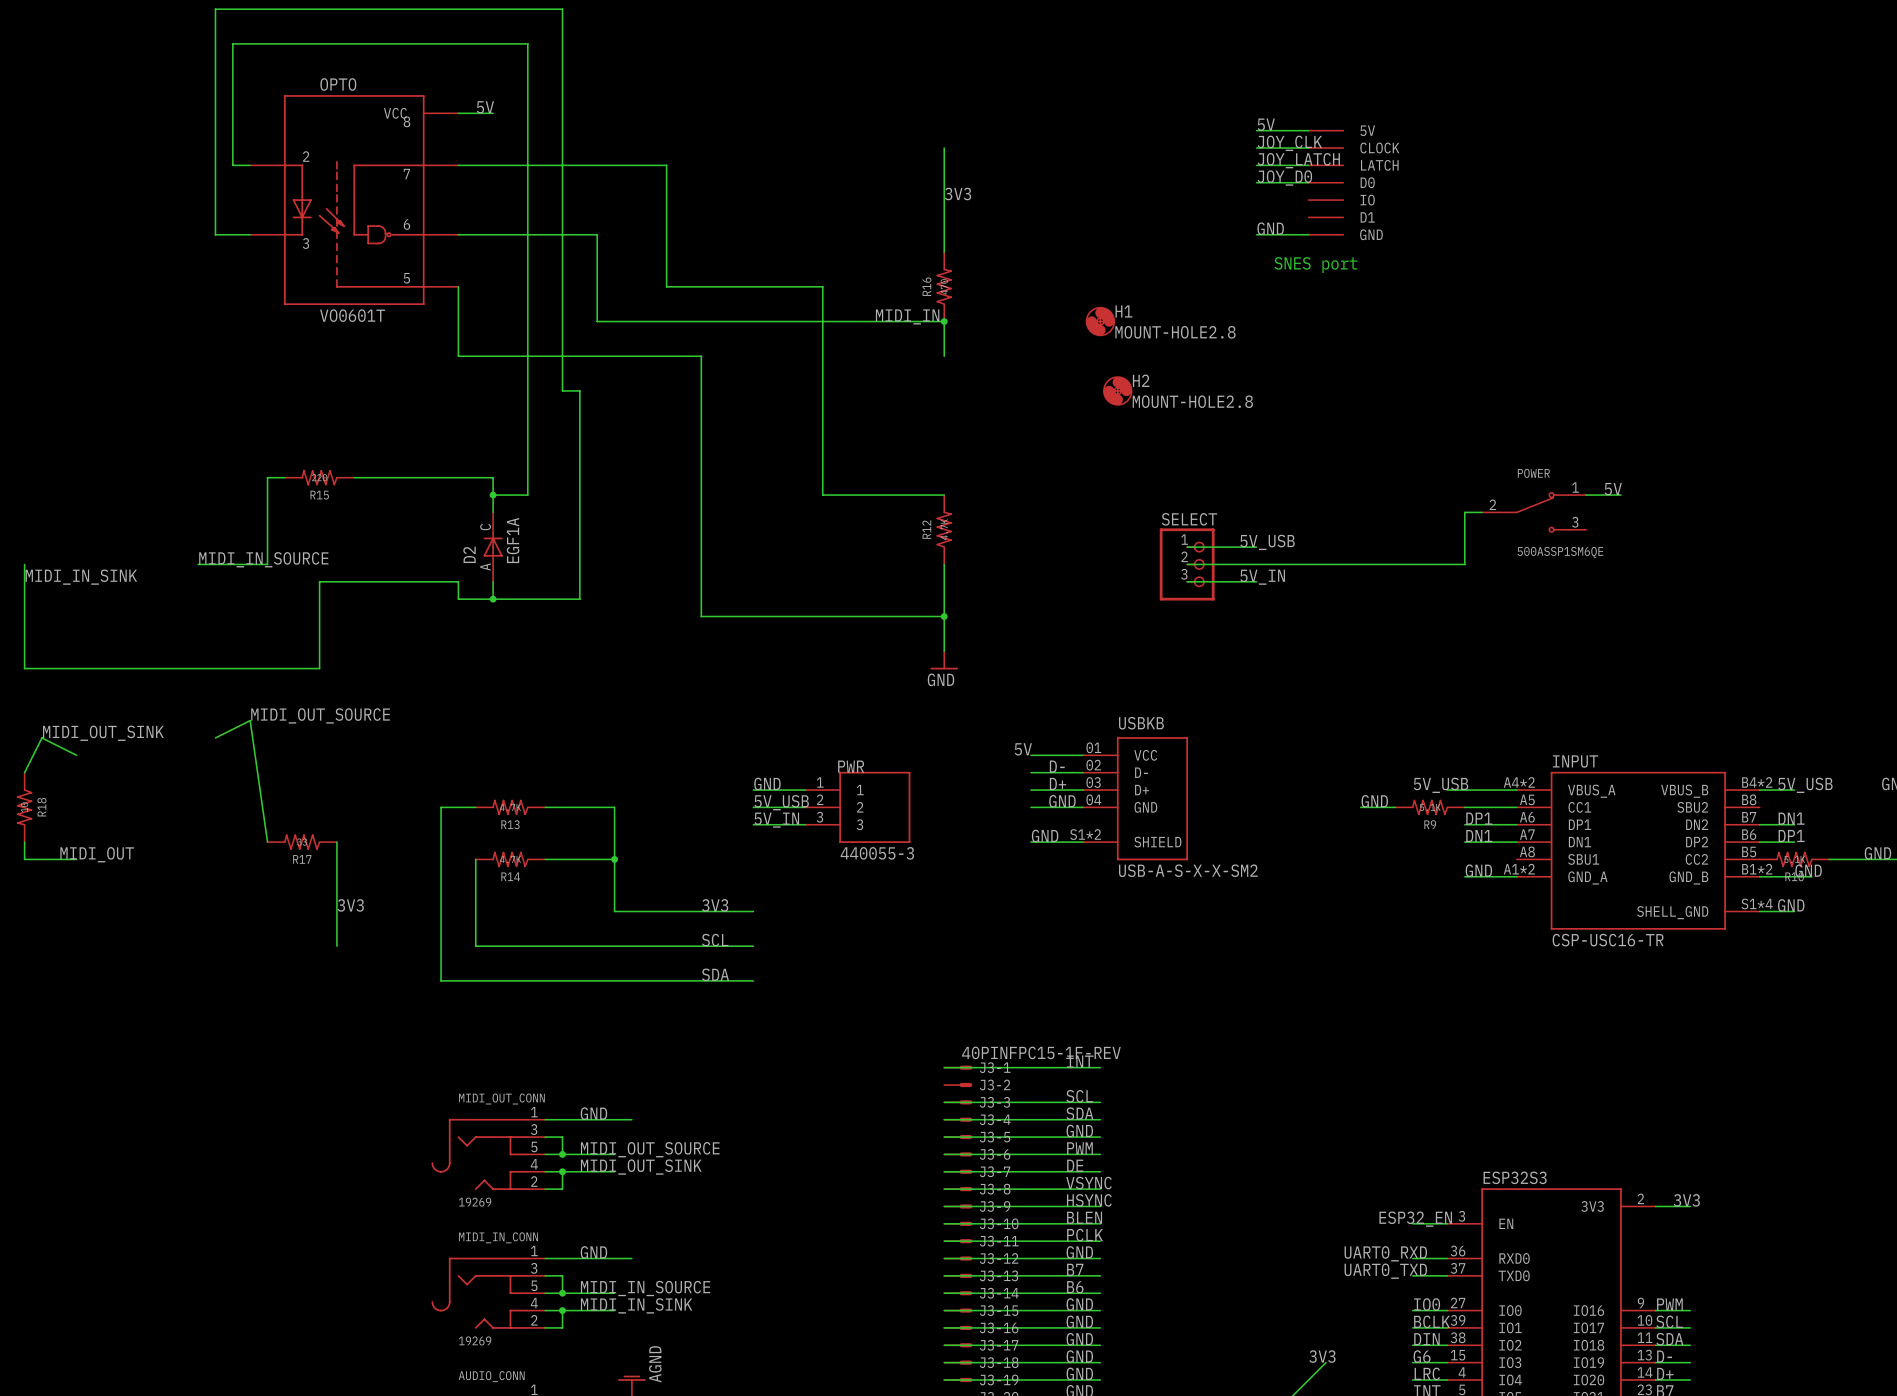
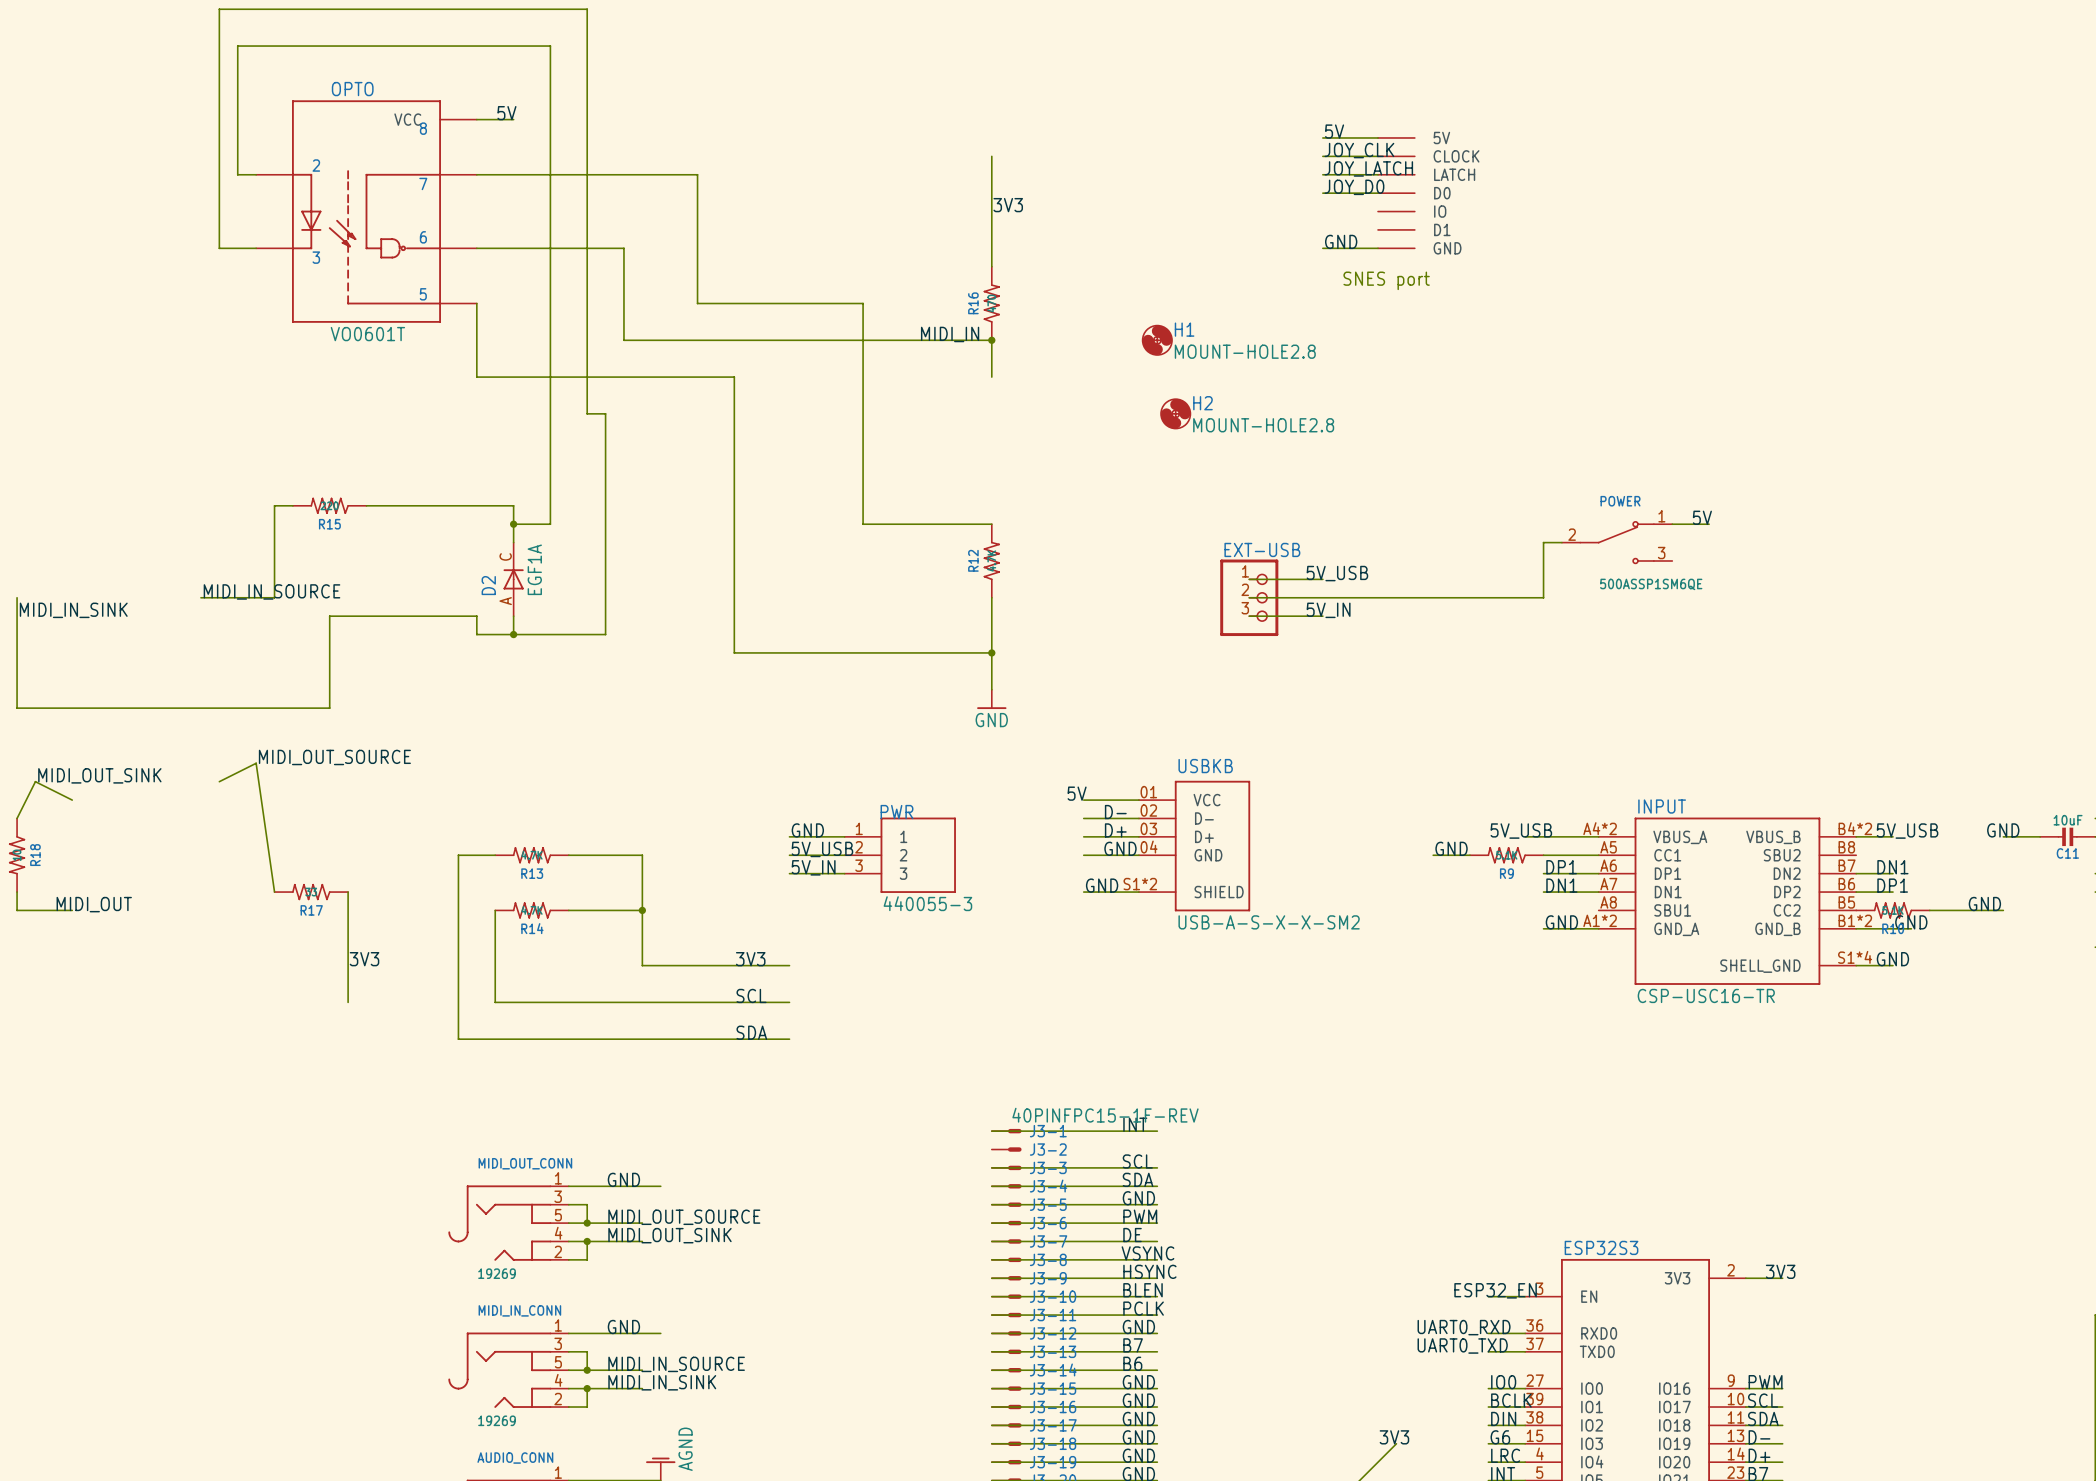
SELECT name: SELECT (1189, 519) -> EXT-USB (1262, 549)

